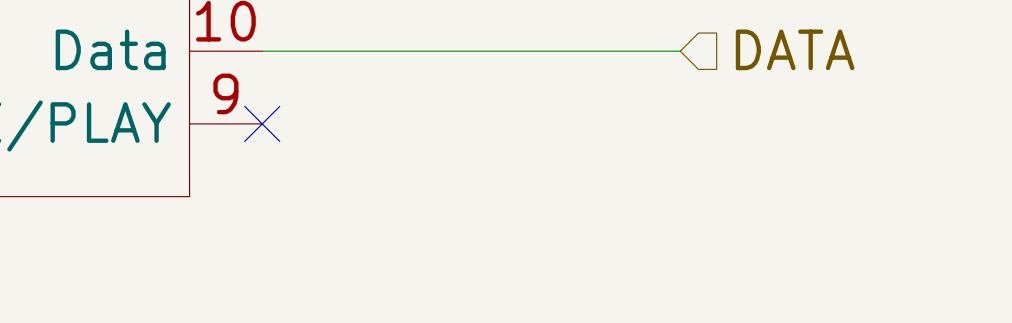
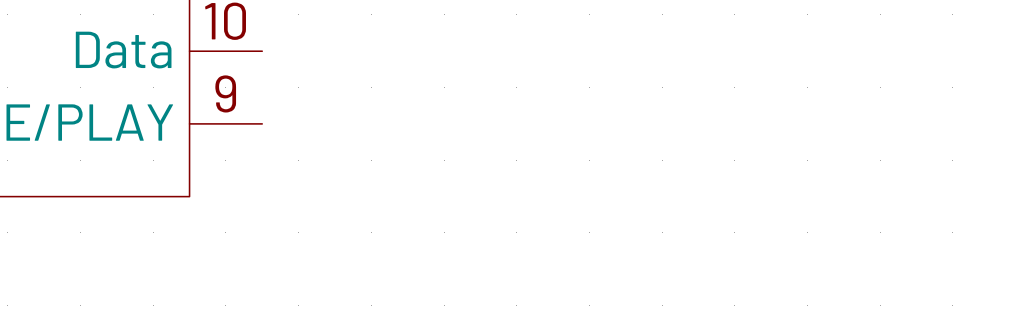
hierarchical label: DATA (795, 49) -> none
wire: (262, 51) (680, 51) -> none
no-connect mark: (262, 123) -> none

